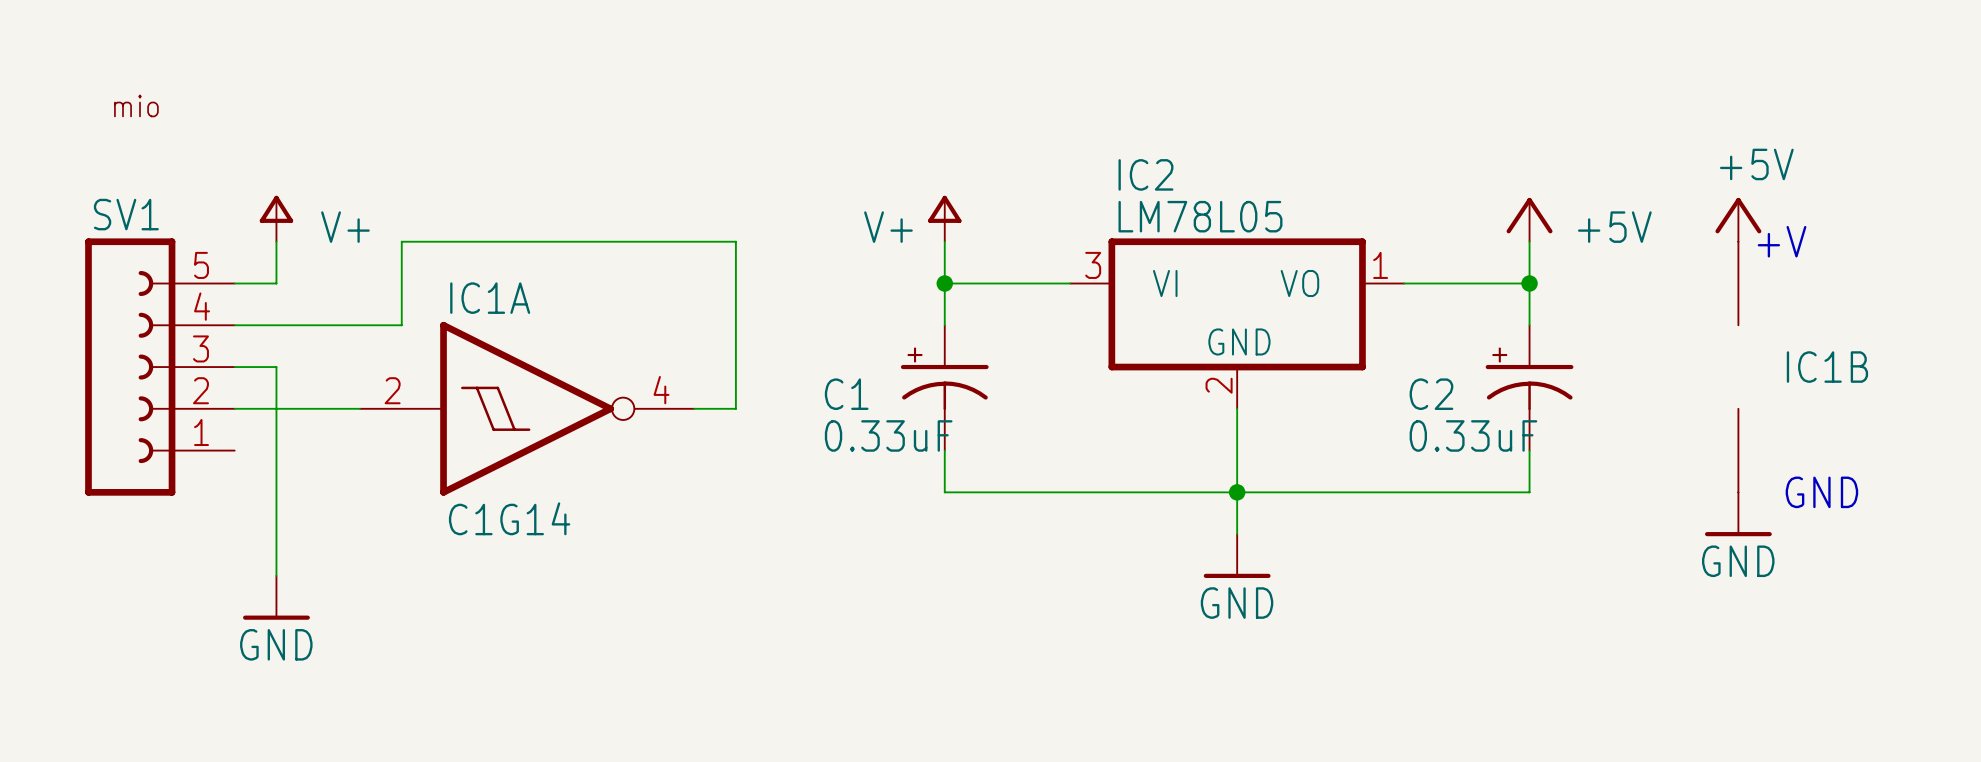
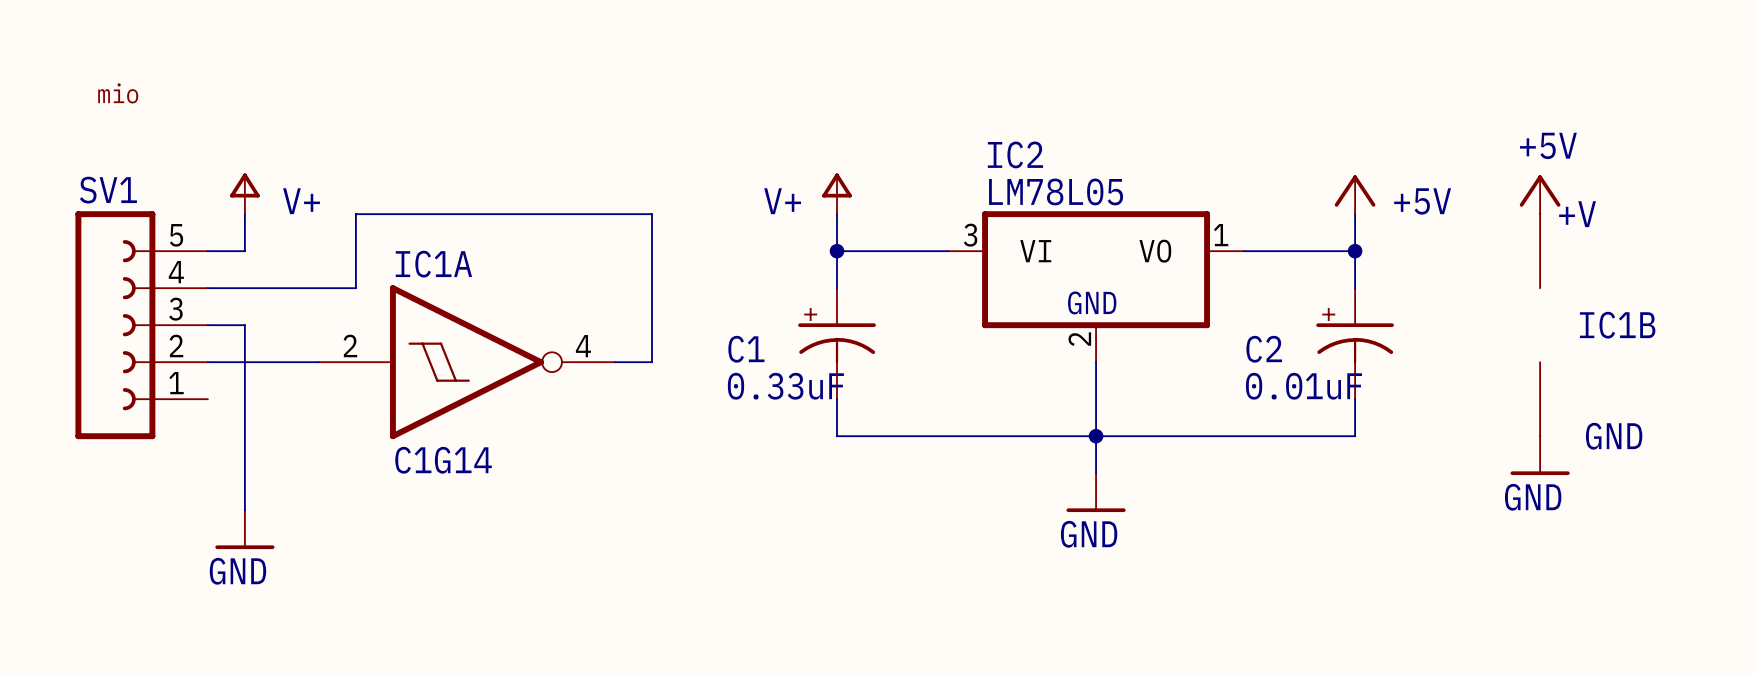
C2 value: 0.33uF (1473, 435) -> 0.01uF (1303, 386)

